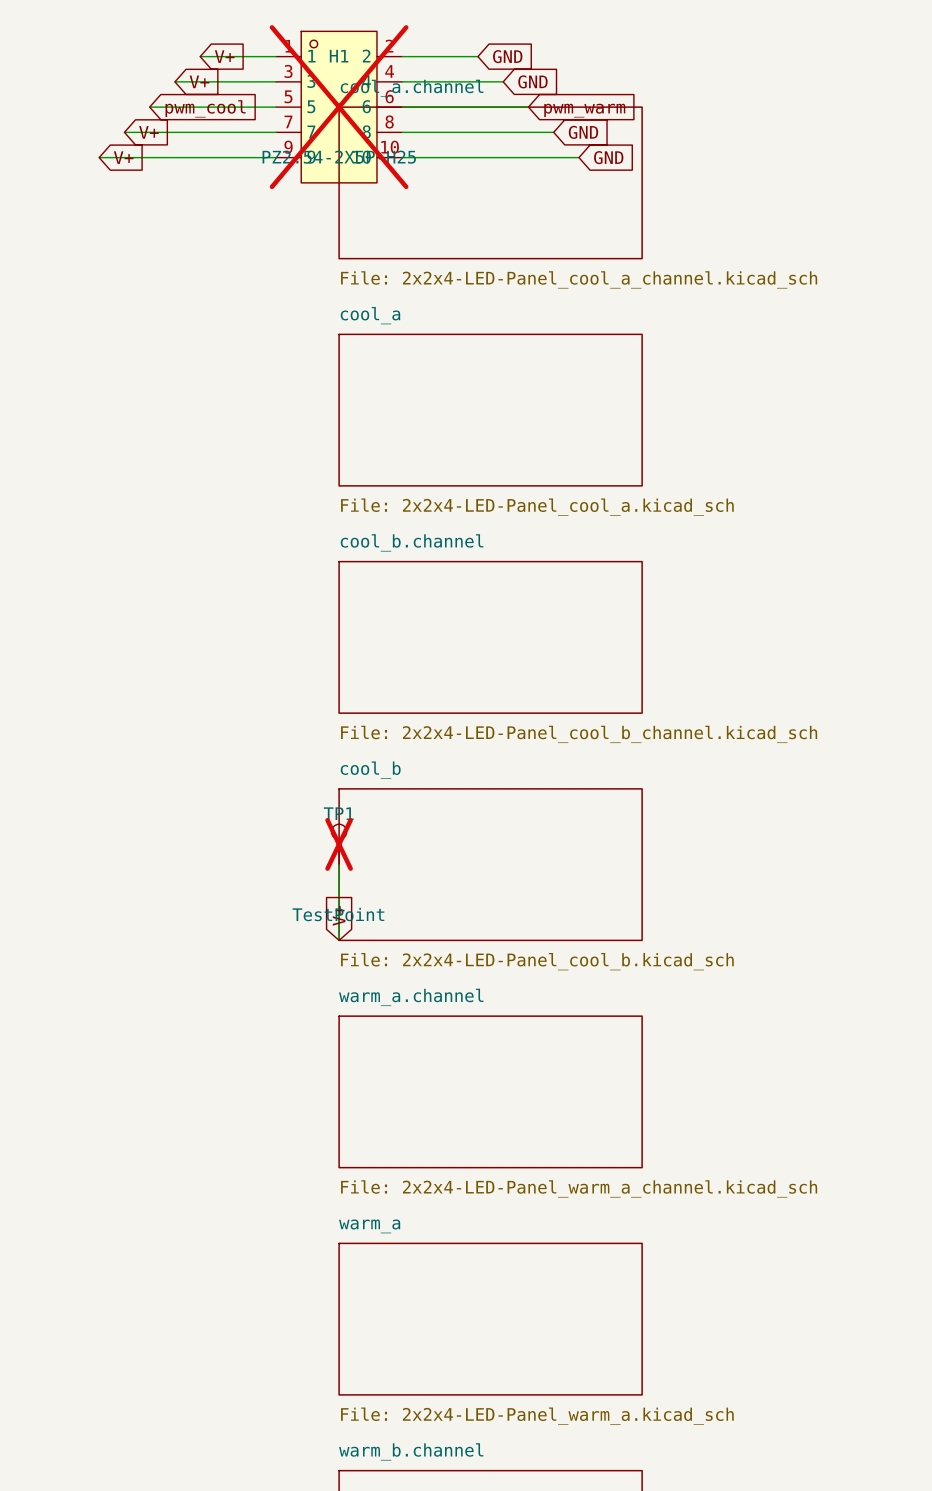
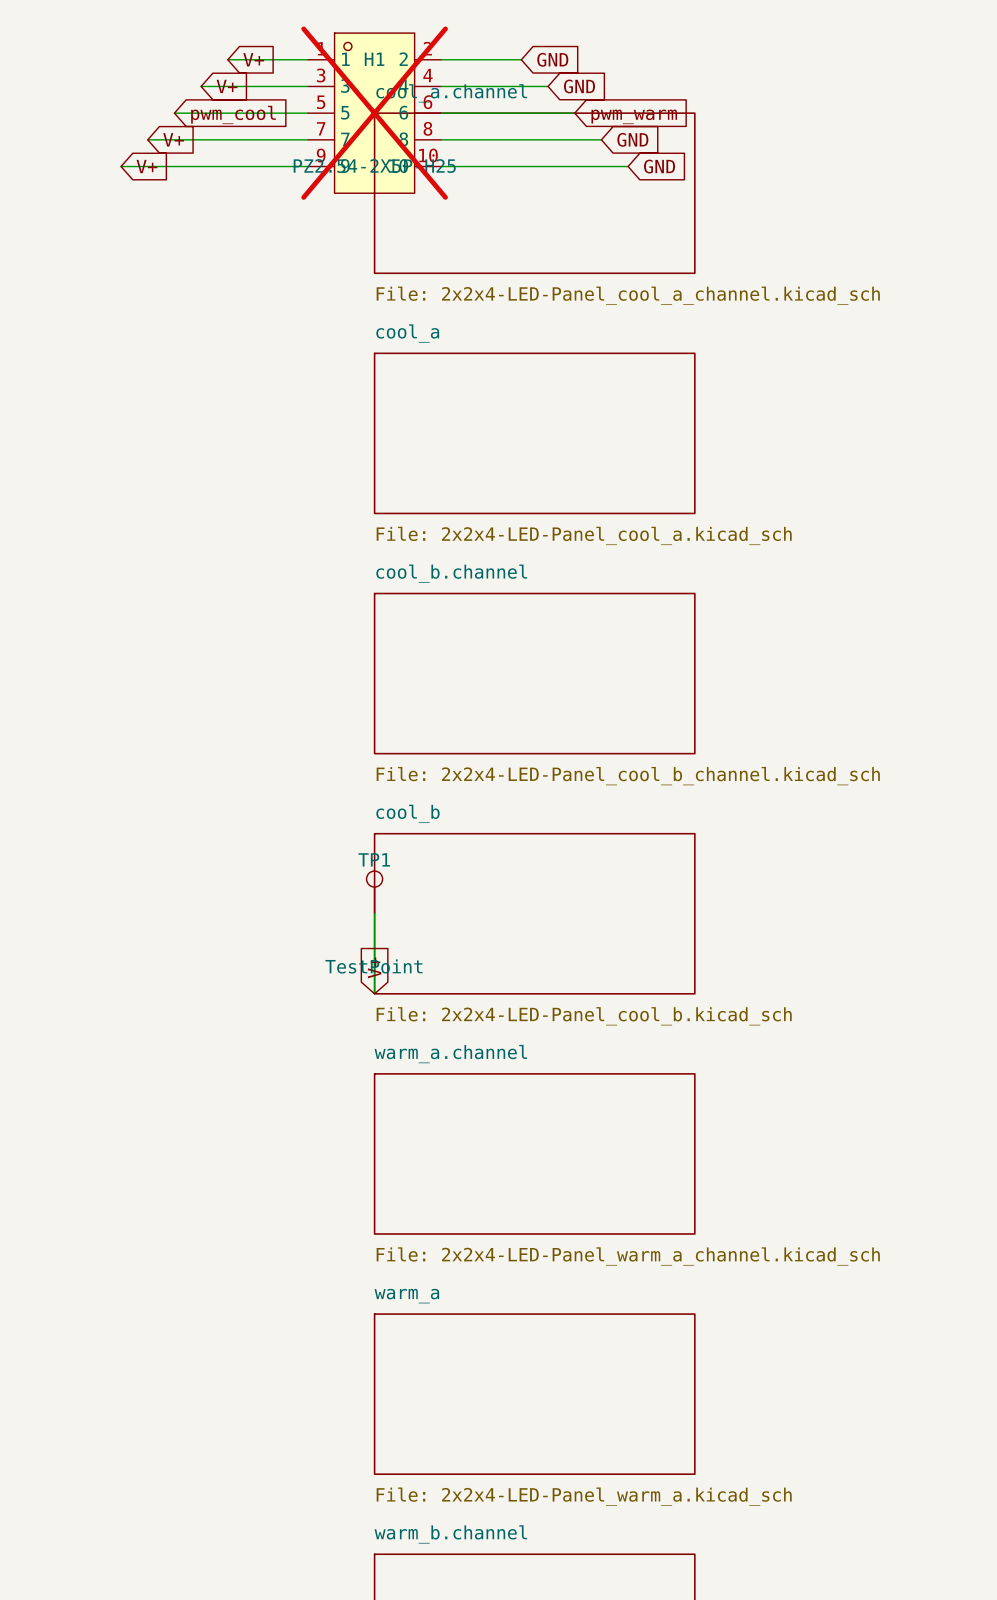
TP1 do-not-place cross: (339, 844) -> none

